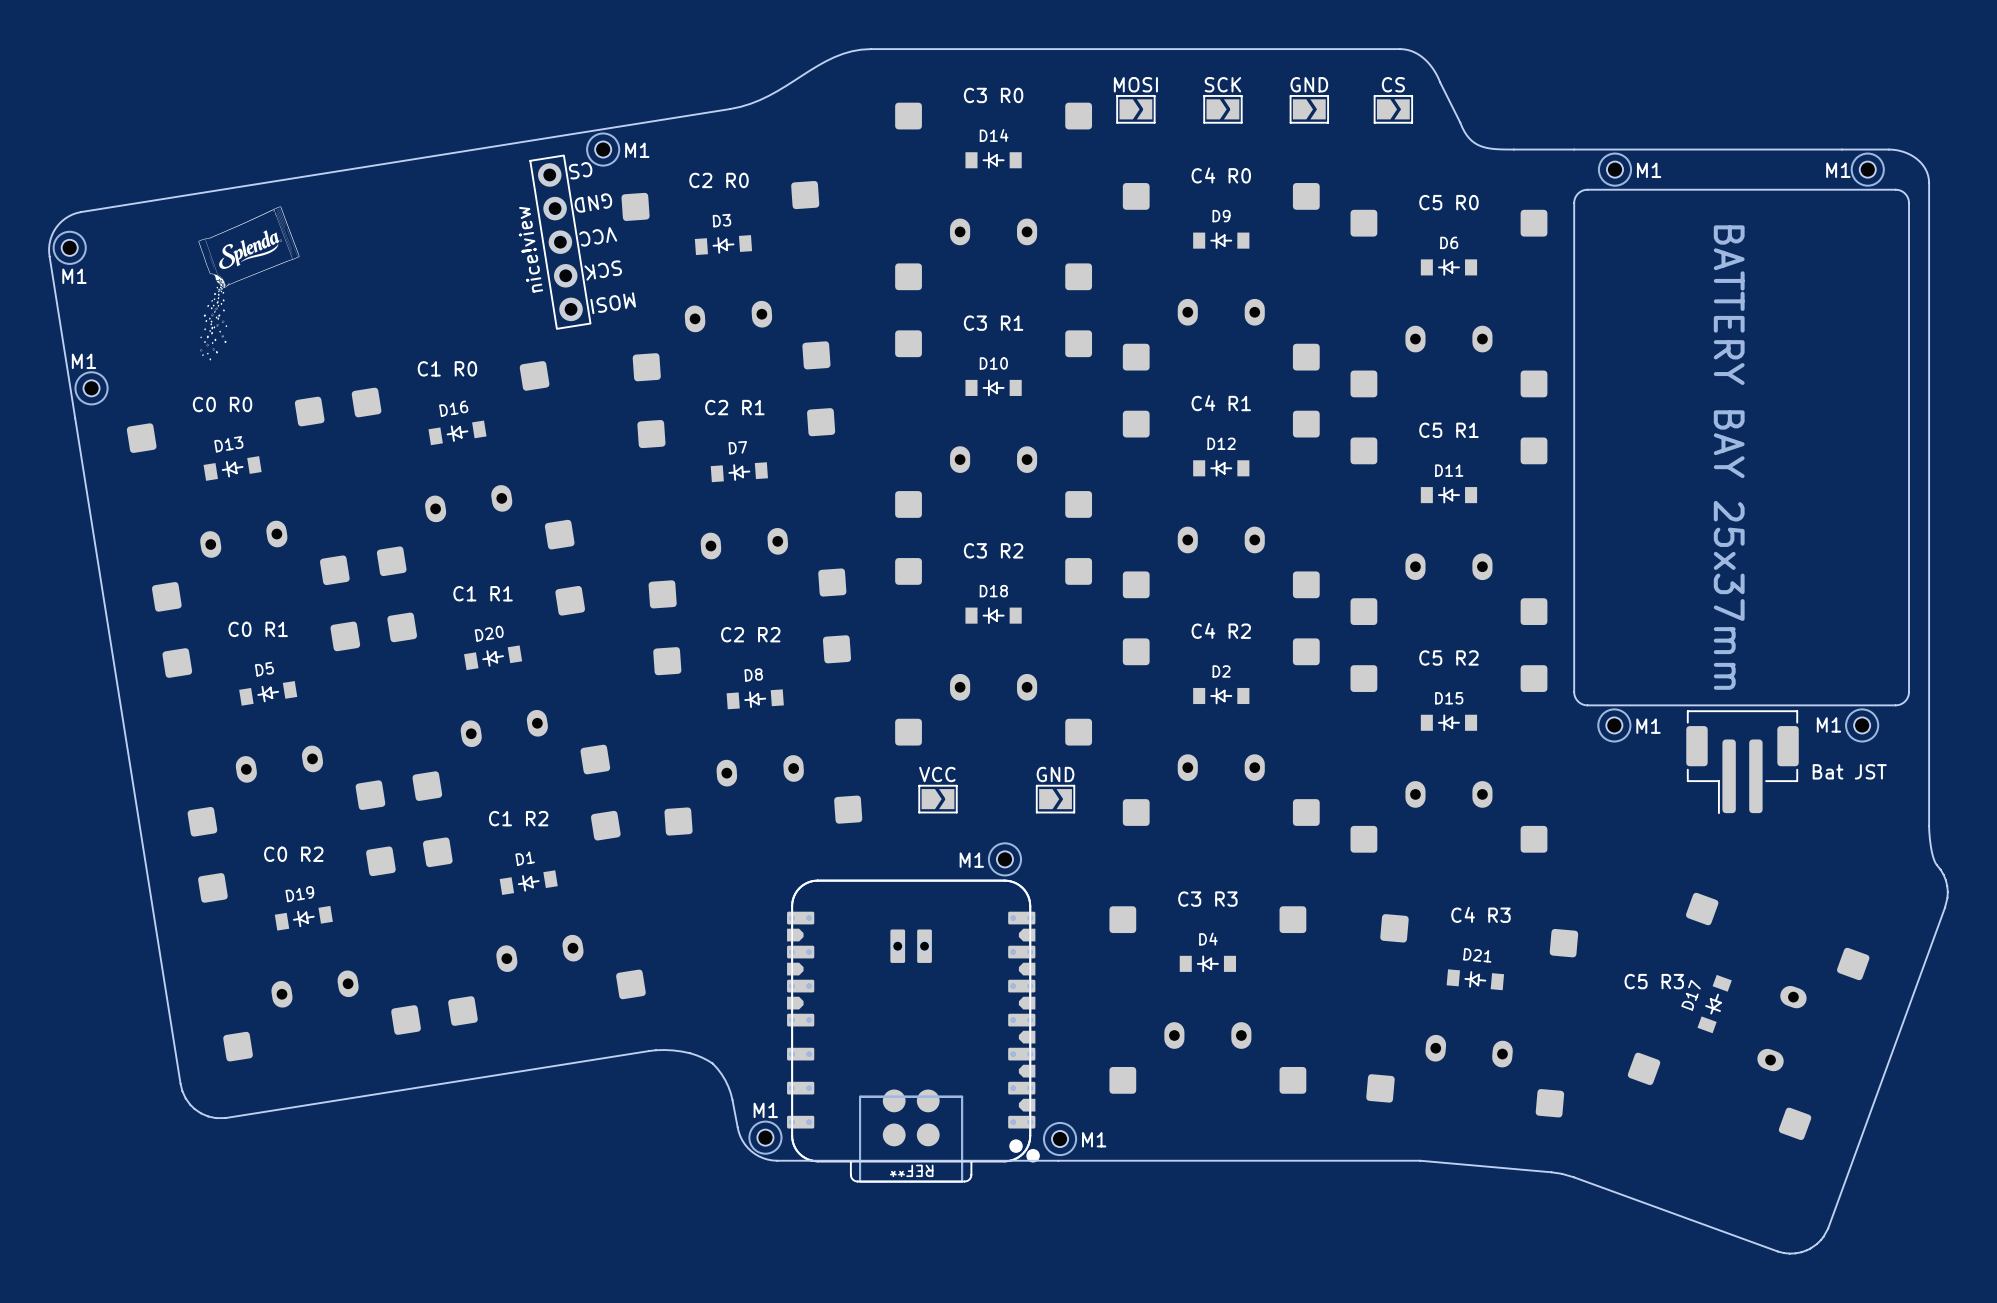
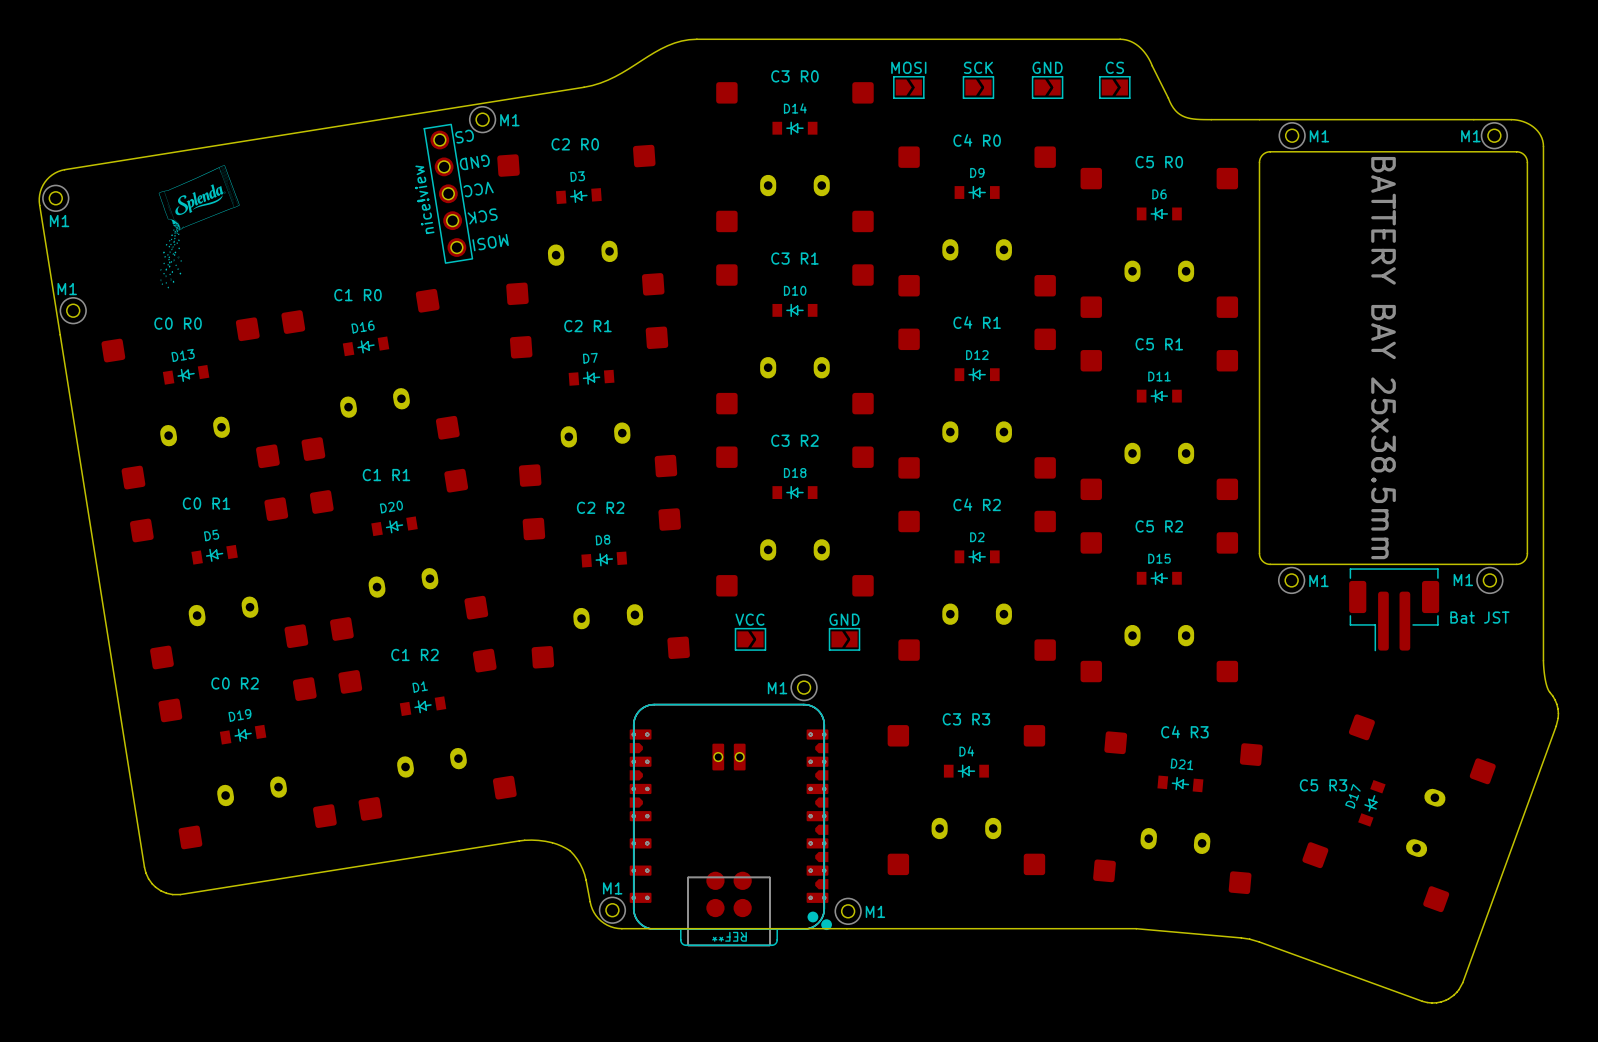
text: BATTERY BAY 25x37mm (1729, 457) -> BATTERY BAY 25x38.5mm (1383, 358)

